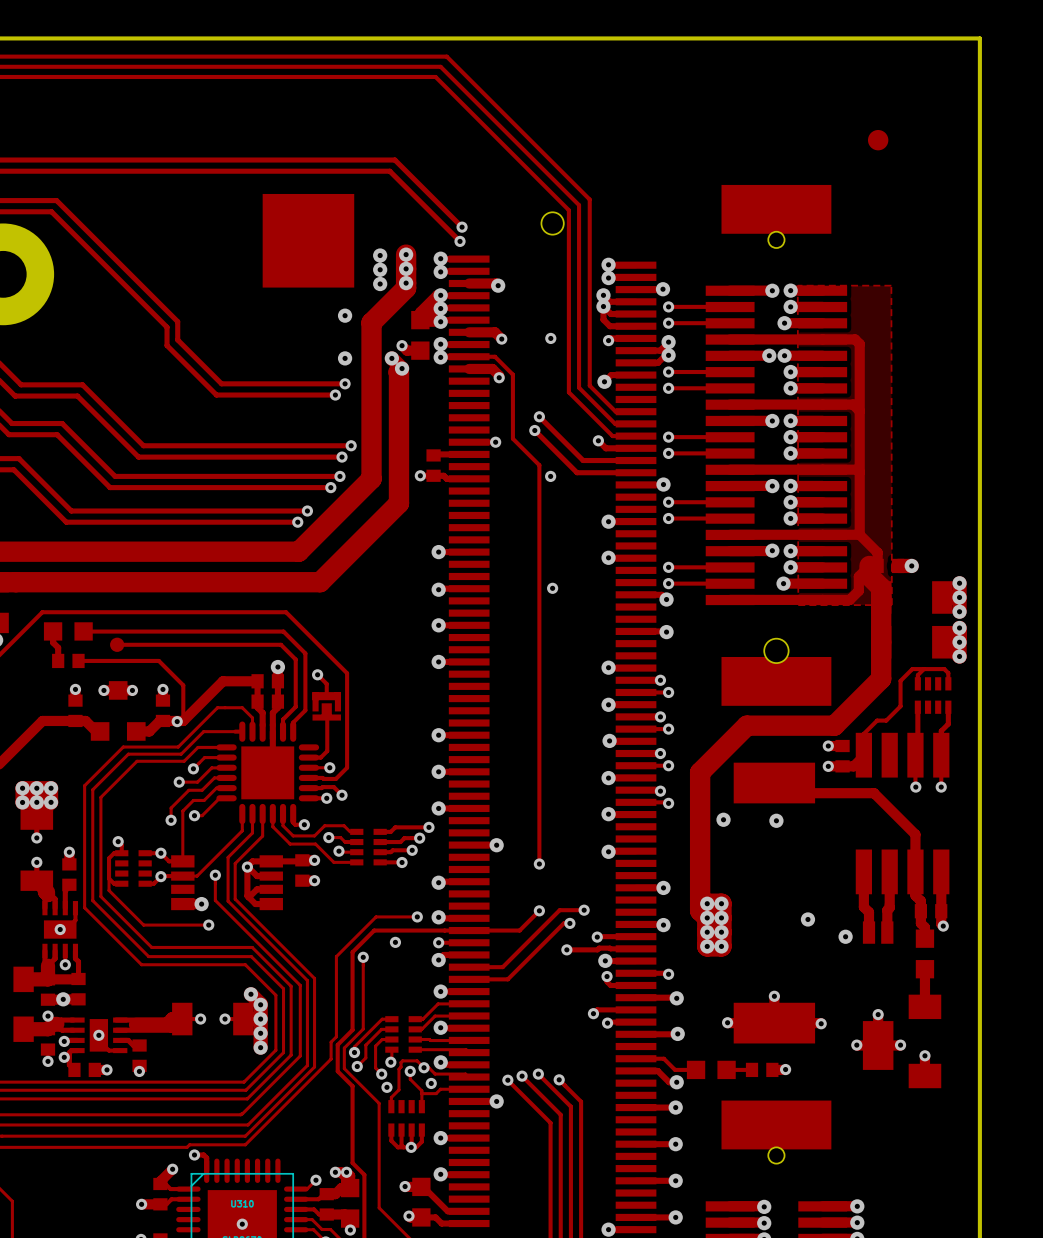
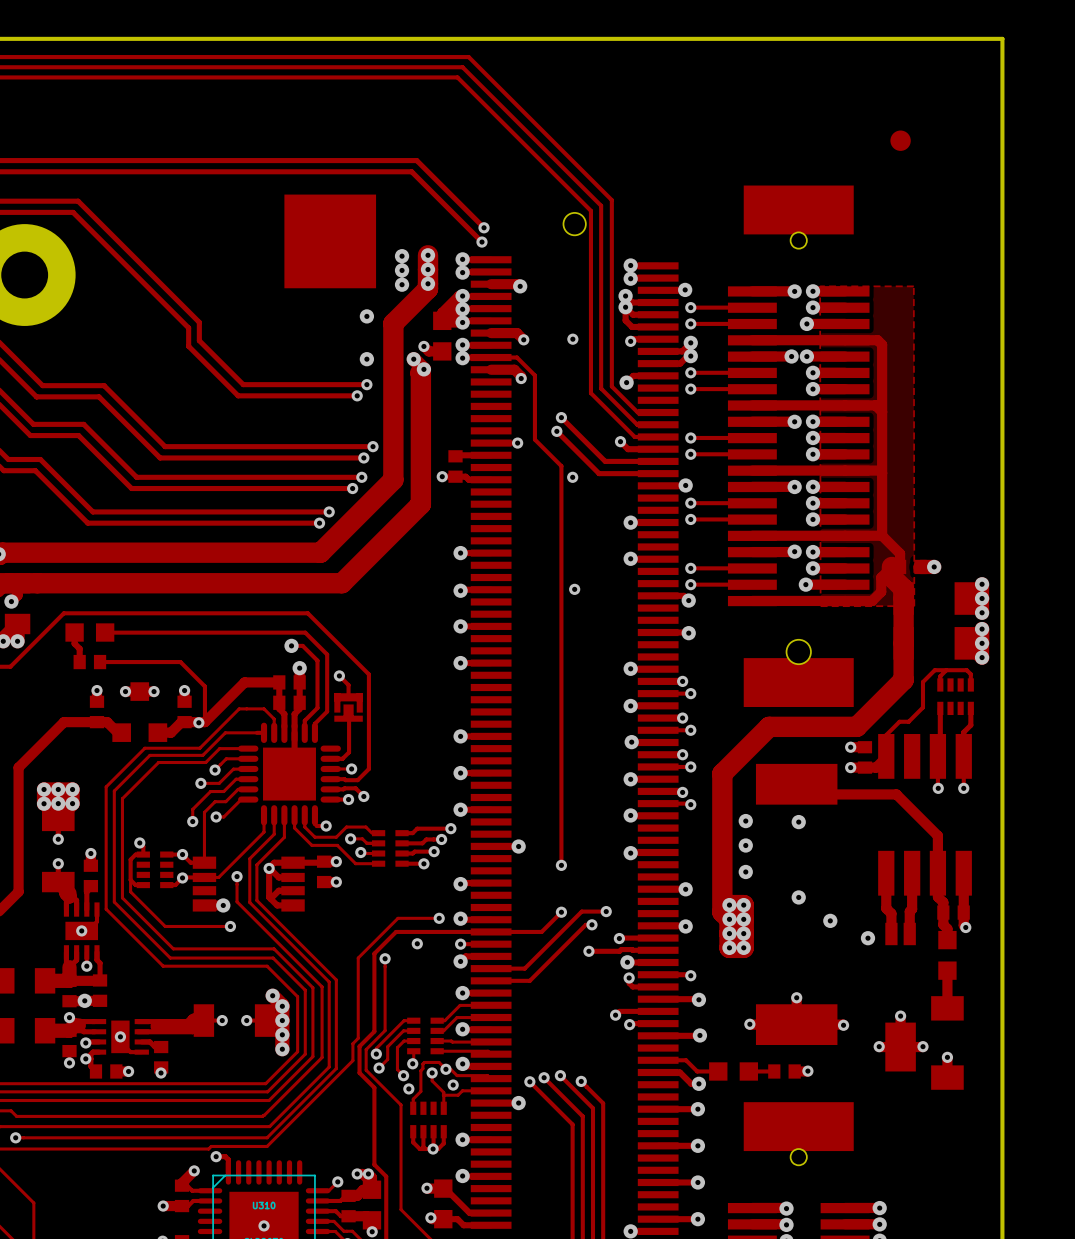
track: (117, 644) (269, 644) -> none
part: (117, 644) -> none
via: none -> (291, 645)
via: none -> (745, 845)
via: none -> (745, 871)
via: none -> (798, 897)

